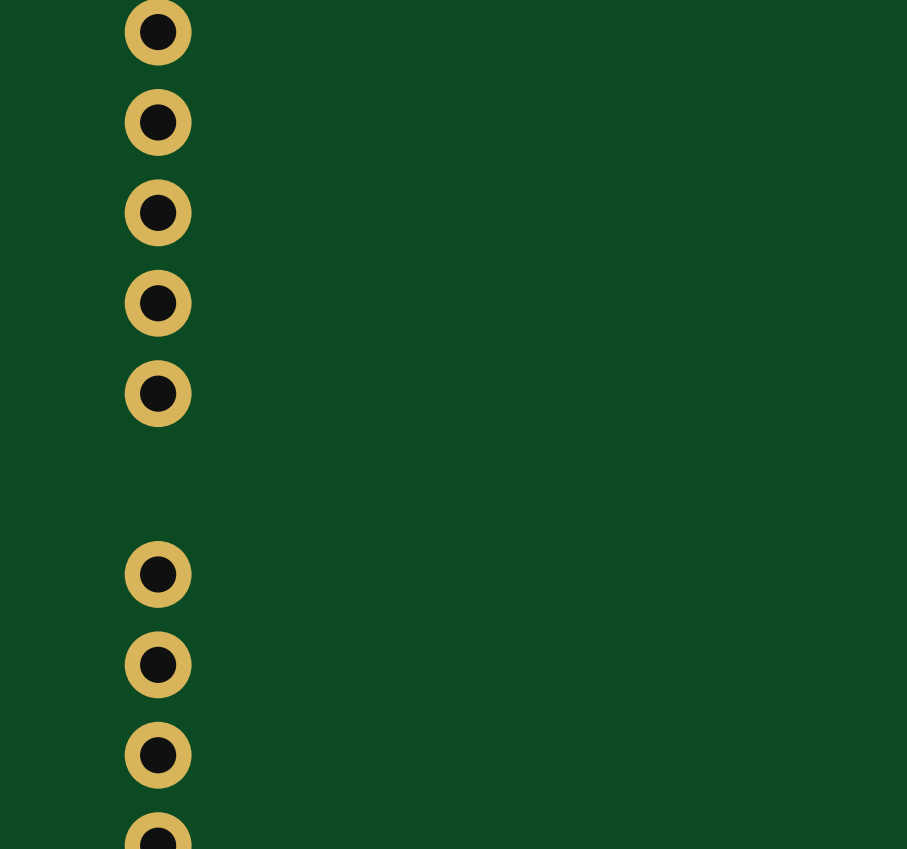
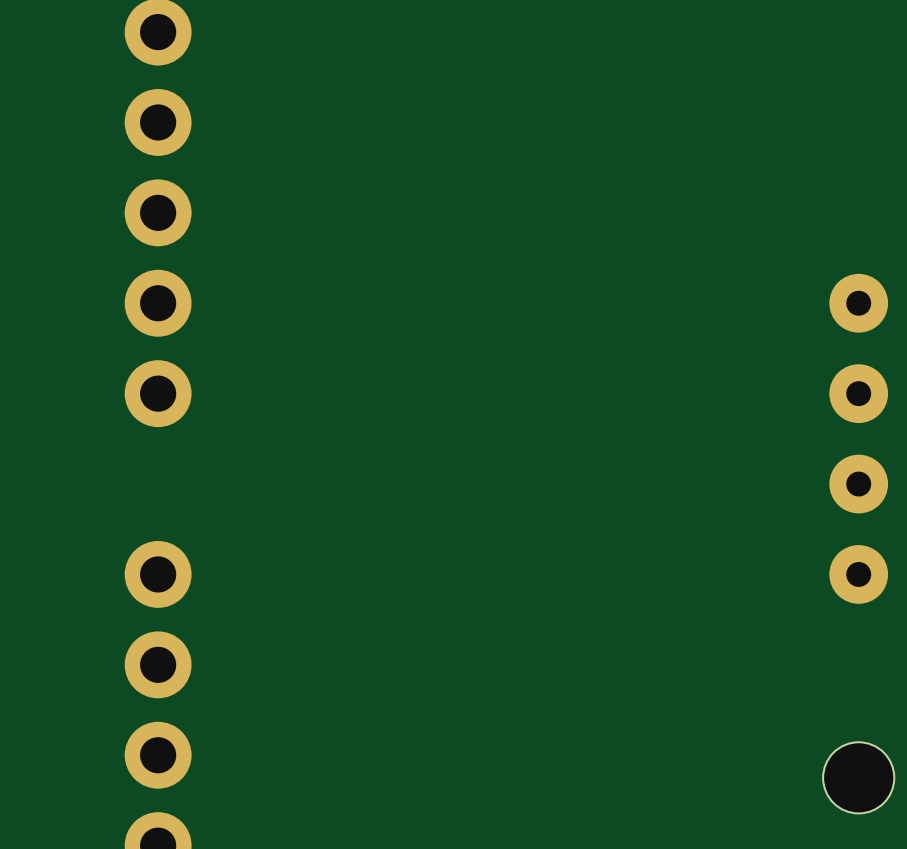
part: none -> (858, 348)
part: none -> (858, 529)
part: none -> (858, 777)

